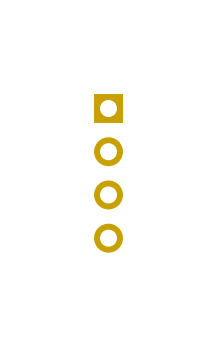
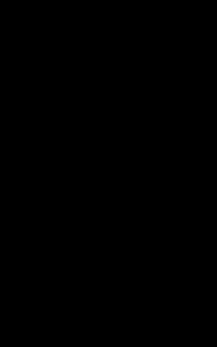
part: (108, 173) -> none

